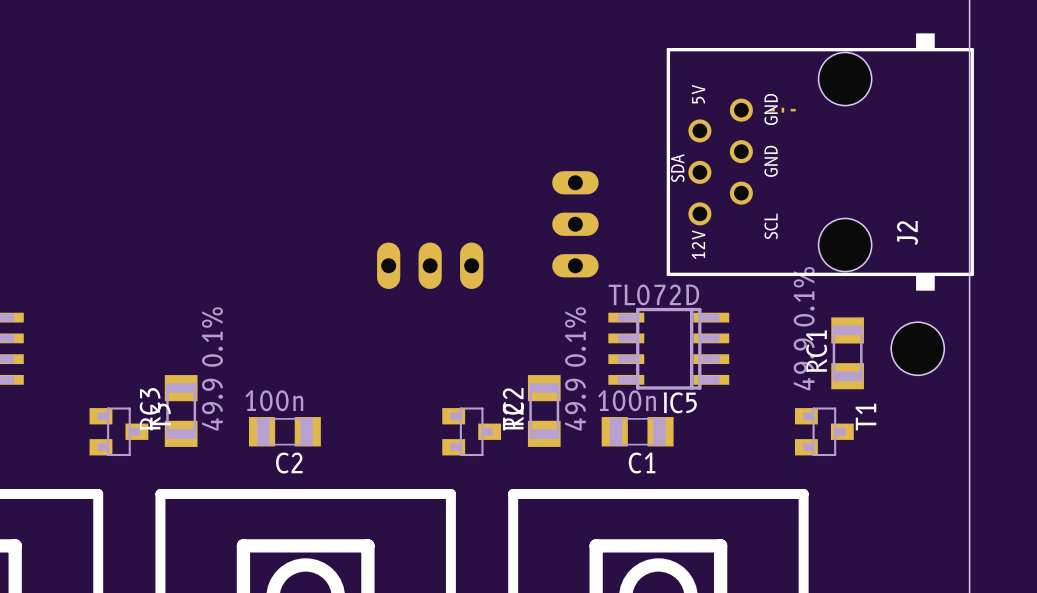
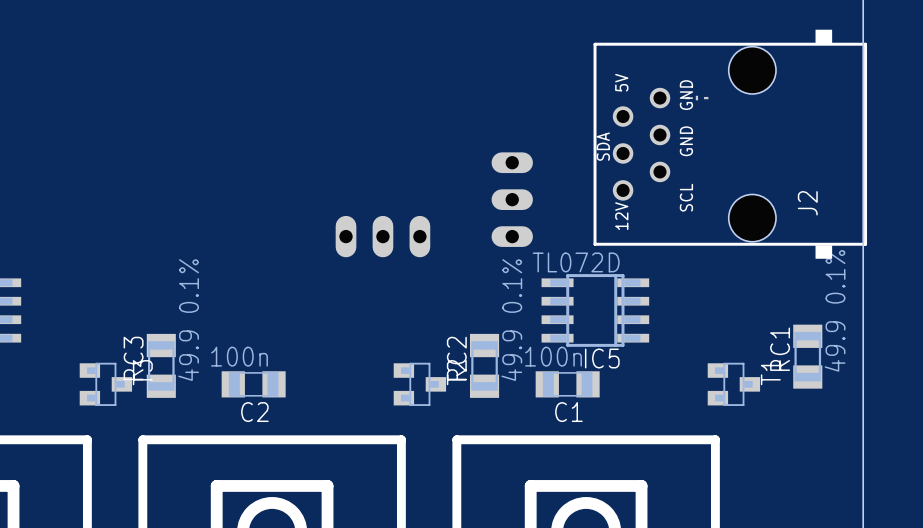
RC1 value position: 49.9 0.1% (804, 328) -> 49.9 0.1% (835, 310)
hole: (917, 348) -> none
RC1 position: (847, 353) -> (807, 356)

